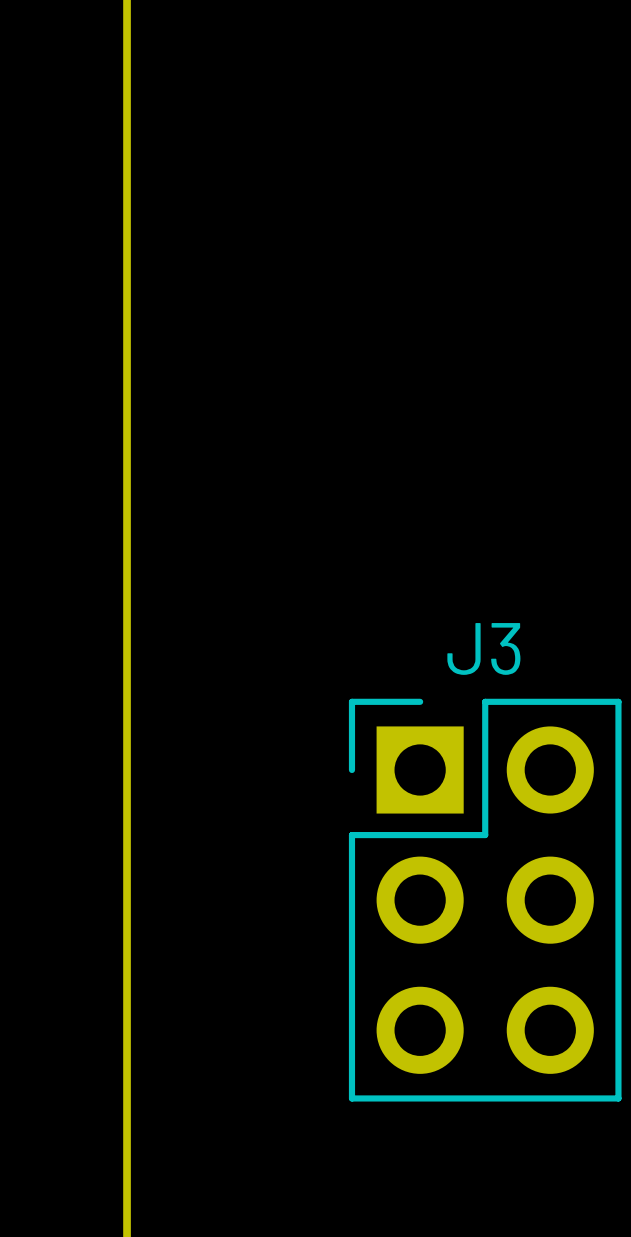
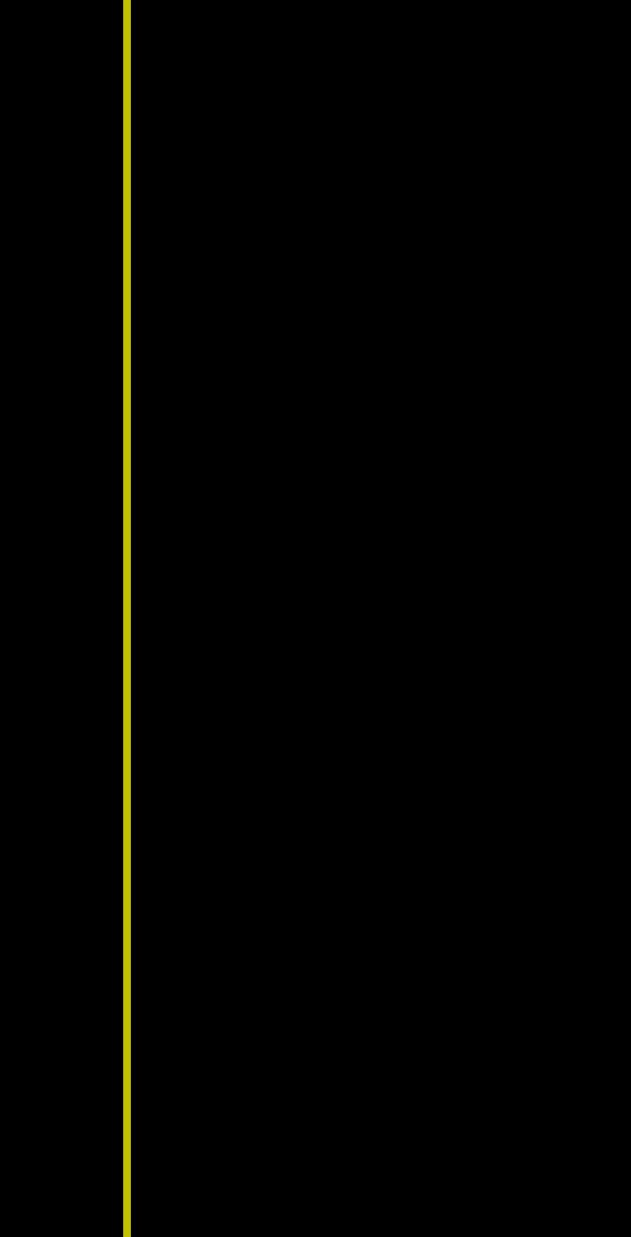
J3: (485, 900) -> none

